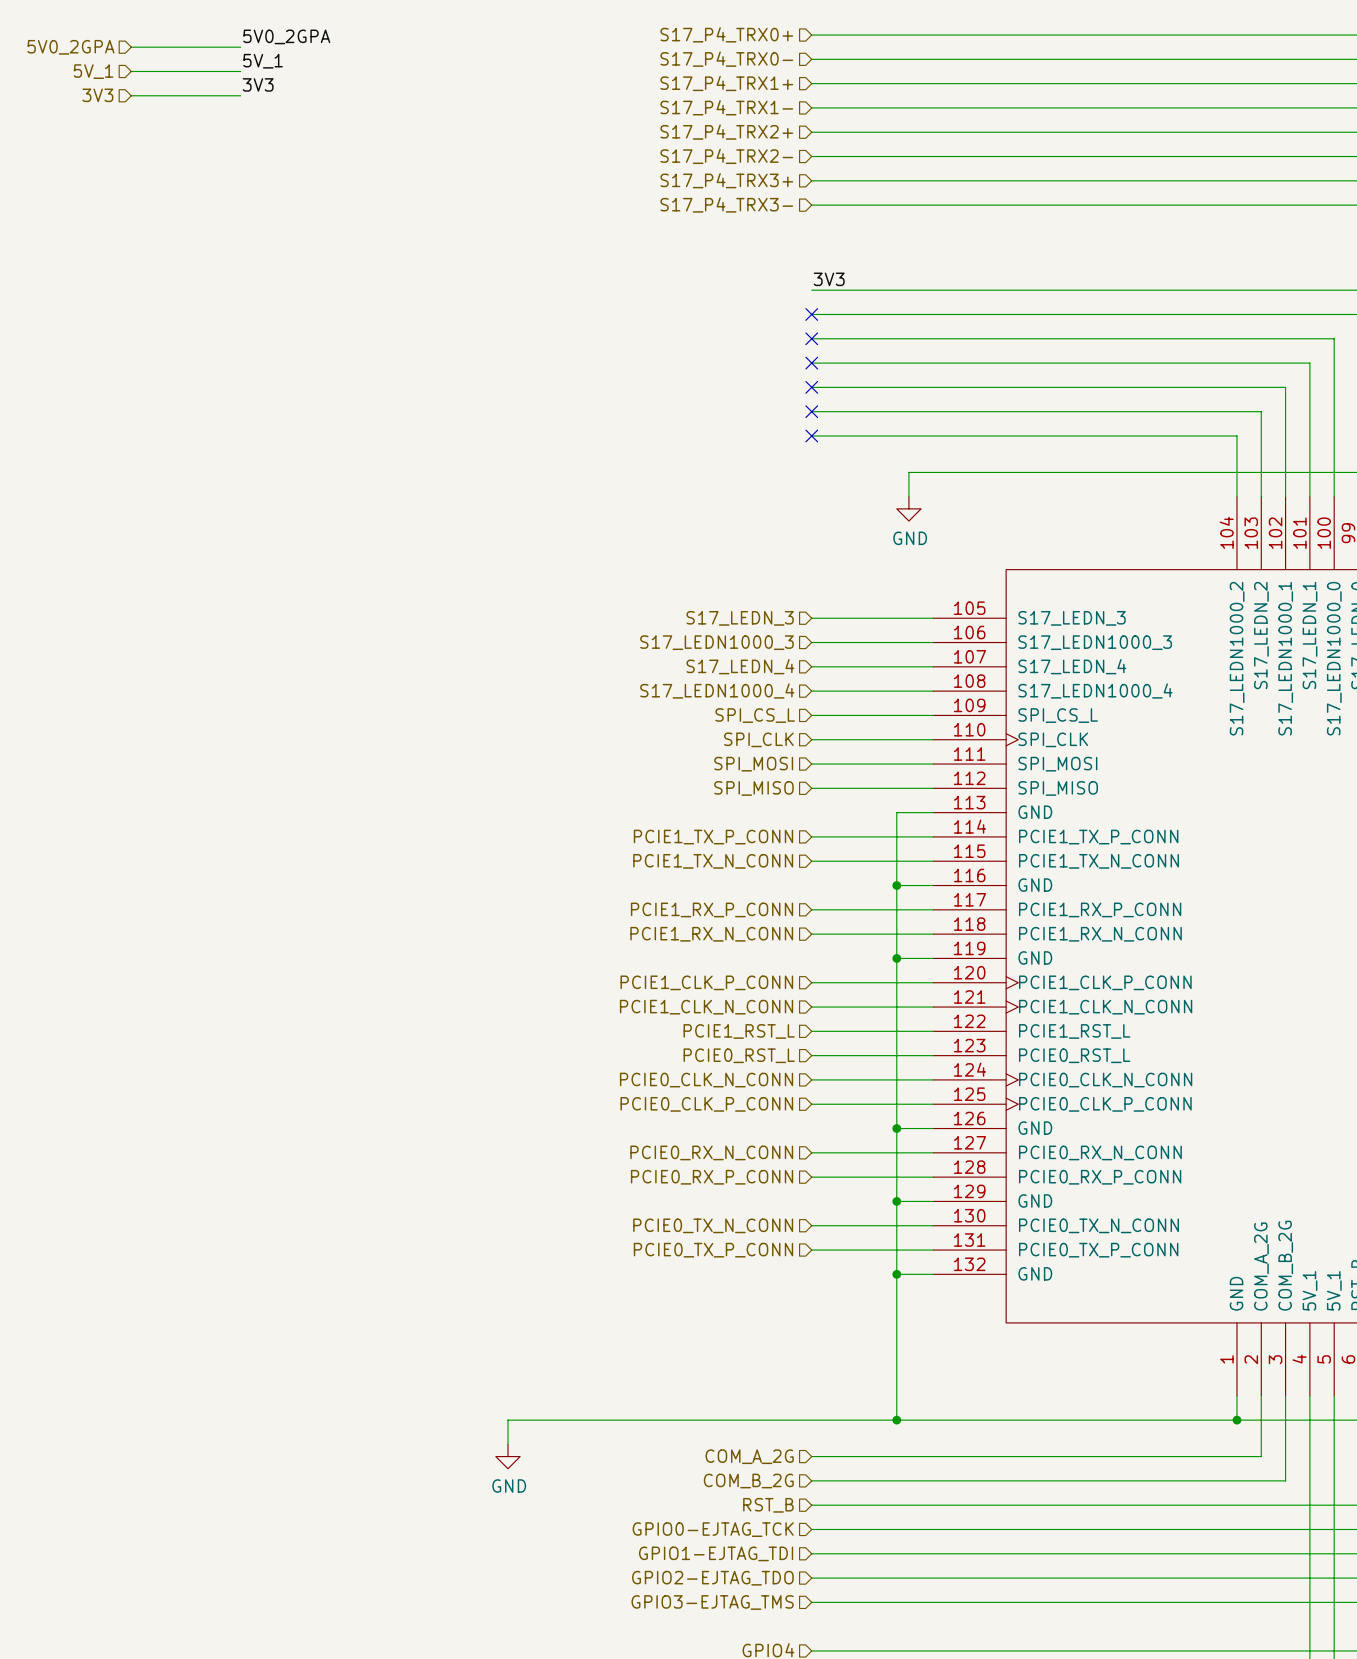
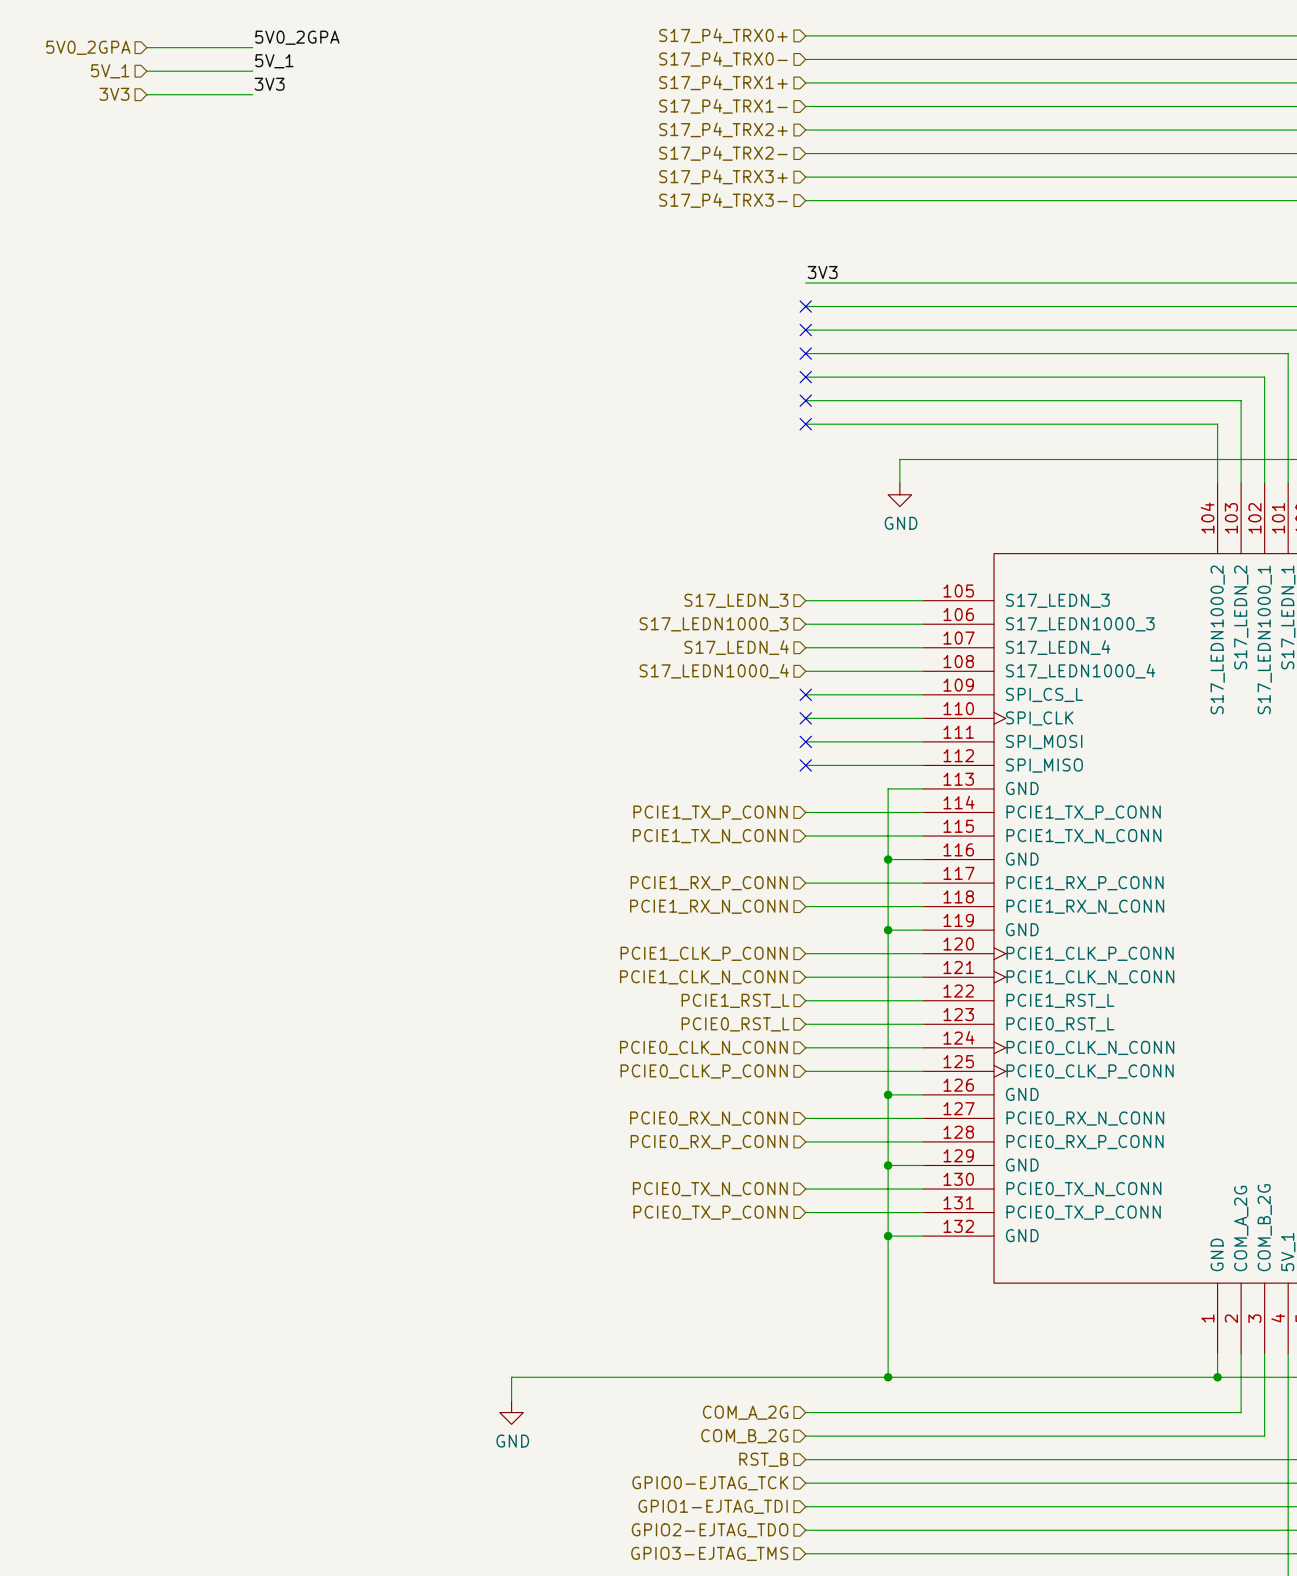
hierarchical label: SPI_CS_L (755, 715) -> none
no-connect mark: none -> (805, 694)
hierarchical label: SPI_CLK (758, 739) -> none
no-connect mark: none -> (805, 718)
hierarchical label: SPI_MOSI (753, 764) -> none
no-connect mark: none -> (805, 741)
hierarchical label: SPI_MISO (753, 788) -> none
no-connect mark: none -> (805, 765)

